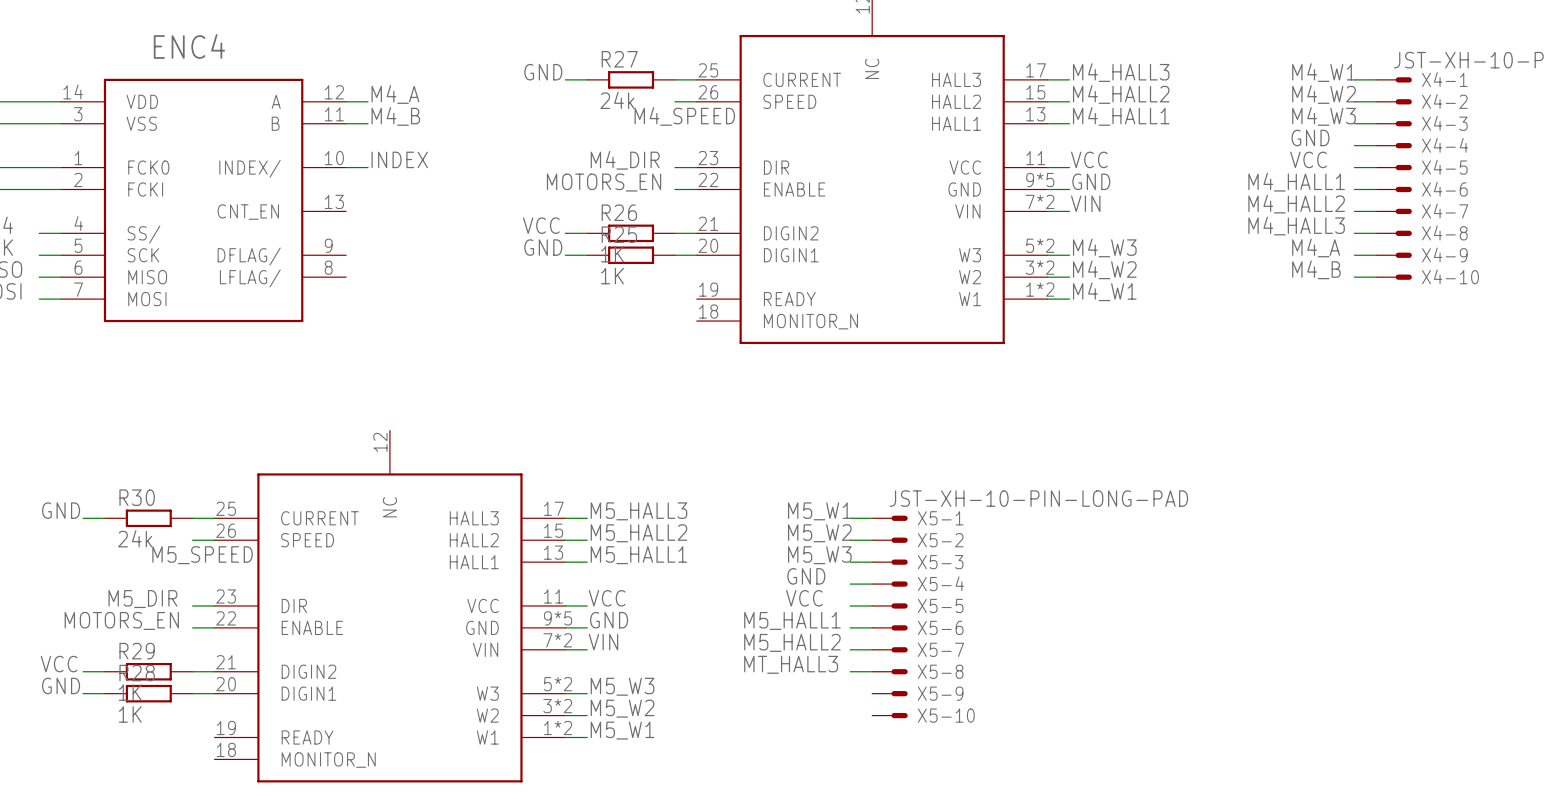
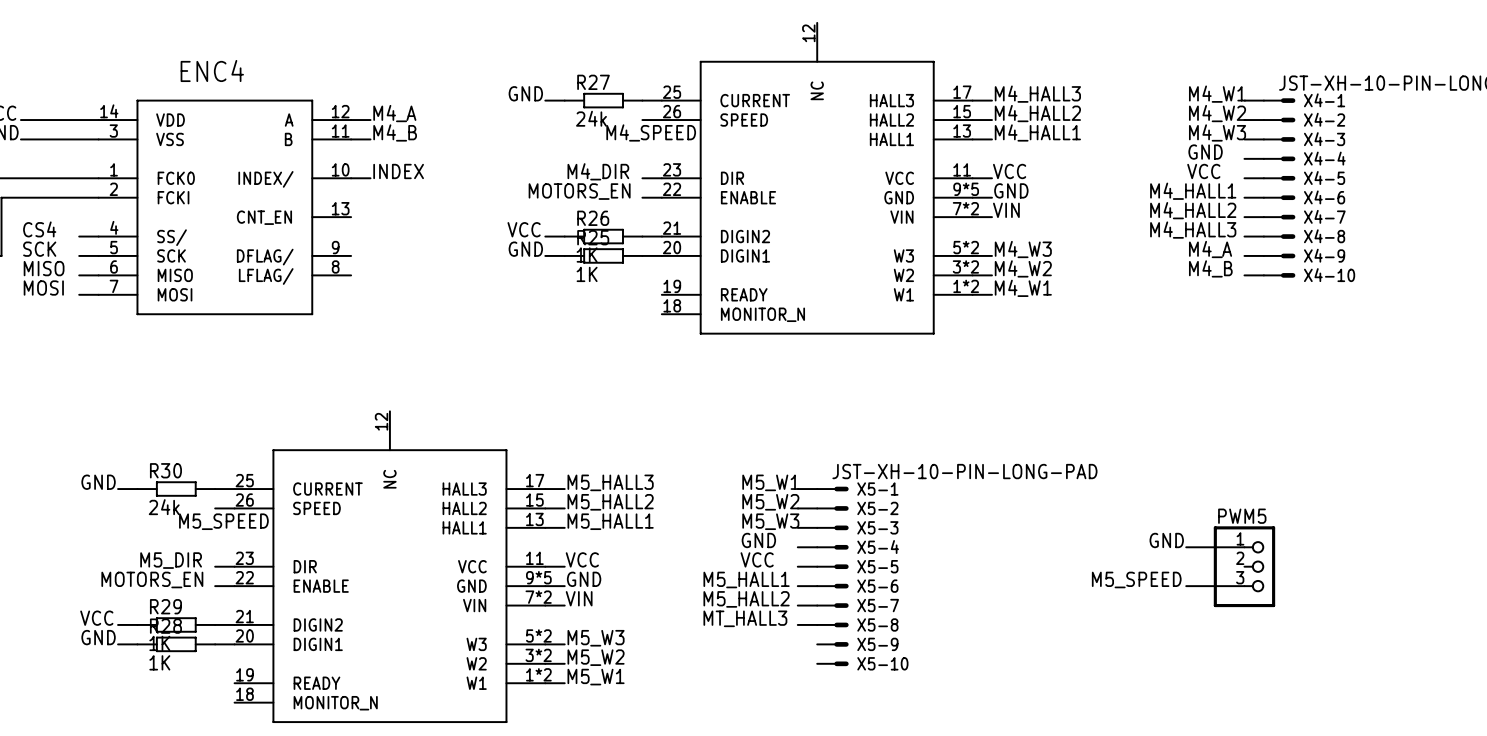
label: none -> GND (1166, 540)
wire: none -> (1186, 547) (1244, 547)
PWM5: none -> (1244, 566)
label: none -> M5_SPEED (1136, 579)
wire: none -> (1186, 586) (1244, 586)

